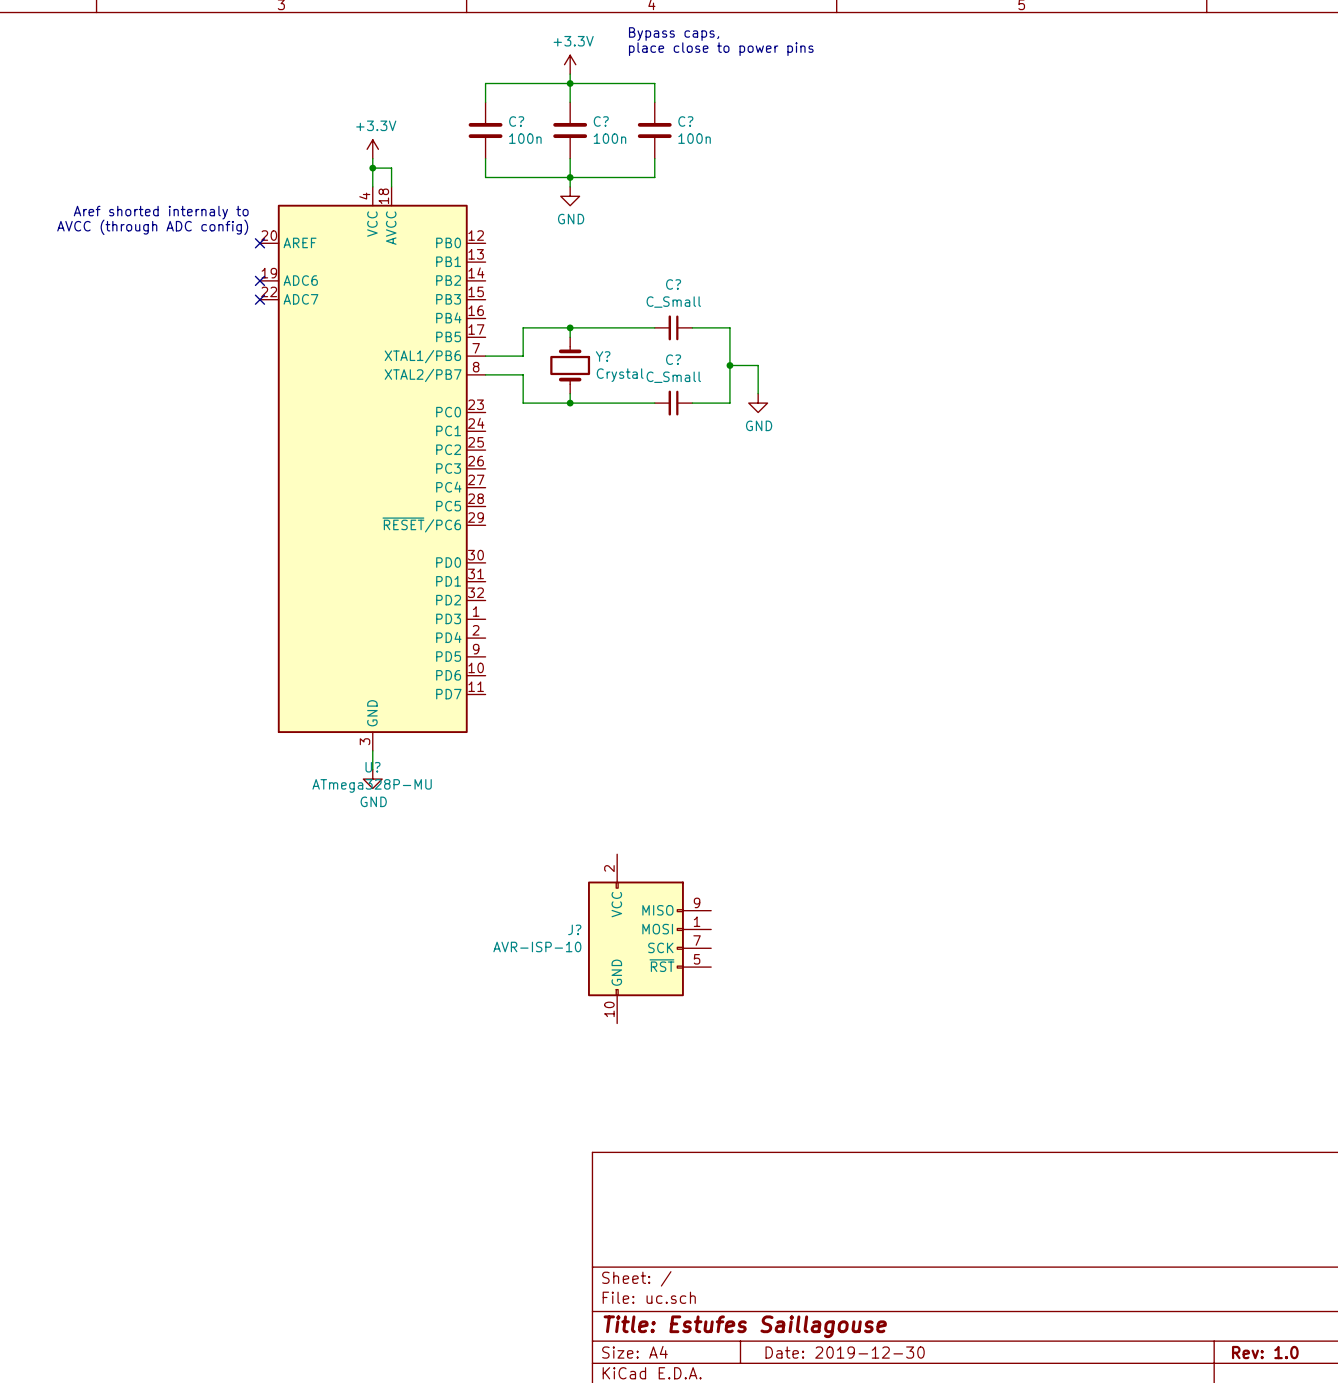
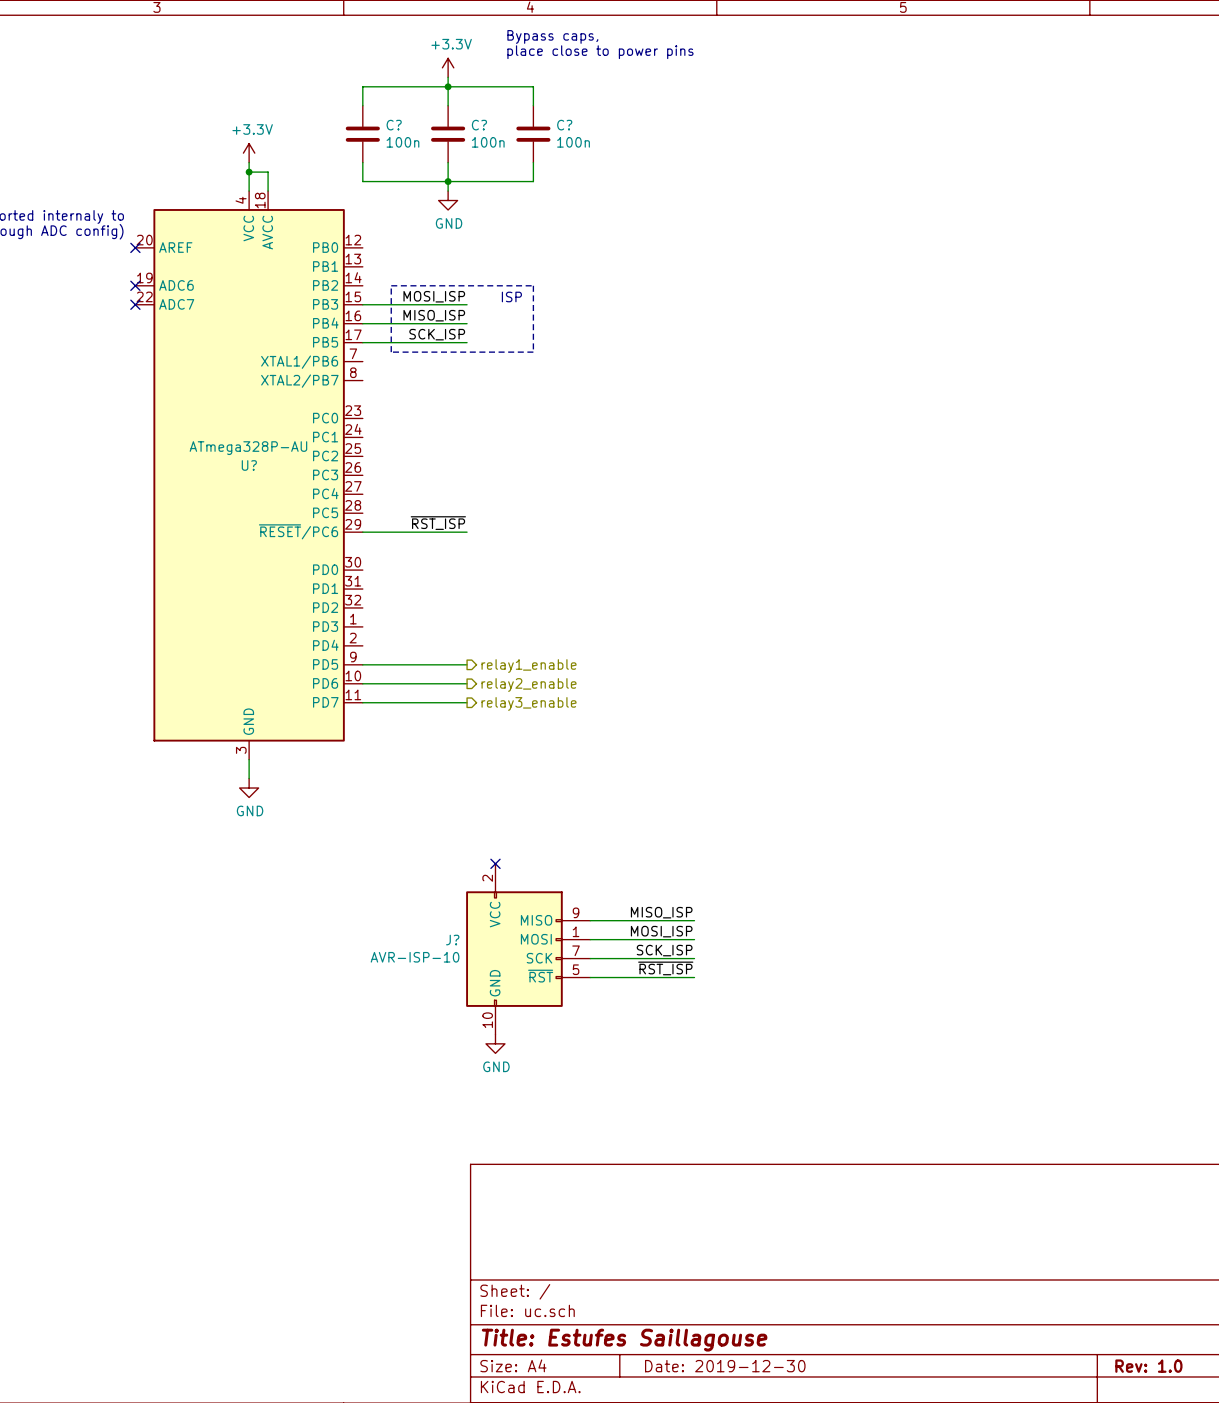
line: none -> (391, 285) (391, 352) (533, 352) (533, 285) (391, 285)
label: none -> MOSI_ISP (434, 296)
text: none -> ISP (511, 296)
wire: none -> (362, 304) (467, 304)
label: none -> MISO_ISP (434, 315)
wire: none -> (362, 323) (467, 323)
wire: (570, 327) (570, 337) -> none
junction: (570, 327) -> none
wire: (654, 327) (523, 327) (523, 356) (485, 356) -> none
C?: C_Small (673, 327) -> none
wire: (692, 327) (729, 327) (729, 403) (692, 403) -> none
label: none -> SCK_ISP (437, 334)
wire: none -> (362, 342) (467, 342)
Y?: Crystal (570, 365) -> none
wire: (729, 365) (758, 365) (758, 393) -> none
junction: (729, 365) -> none
wire: (485, 374) (523, 374) (523, 403) (654, 403) -> none
wire: (570, 393) (570, 403) -> none
junction: (570, 403) -> none
C?: C_Small (673, 403) -> none
power symbol: GND (758, 403) -> none
label: none -> ~{RST_ISP} (438, 523)
wire: none -> (362, 532) (467, 532)
wire: none -> (362, 664) (467, 664)
hierarchical label: none -> relay1_enable (529, 666)
wire: none -> (362, 683) (467, 683)
hierarchical label: none -> relay2_enable (529, 685)
wire: none -> (362, 702) (467, 702)
hierarchical label: none -> relay3_enable (529, 703)
U? name position: U? (372, 767) -> U? (249, 465)
U? value: ATmega328P-MU (372, 785) -> ATmega328P-AU (248, 448)
no-connect mark: none -> (495, 863)
label: none -> MISO_ISP (661, 912)
wire: none -> (590, 920) (694, 920)
label: none -> MOSI_ISP (661, 931)
wire: none -> (590, 939) (694, 939)
label: none -> SCK_ISP (664, 950)
wire: none -> (590, 958) (694, 958)
label: none -> ~{RST_ISP} (665, 968)
wire: none -> (590, 977) (694, 977)
power symbol: none -> GND (495, 1043)

